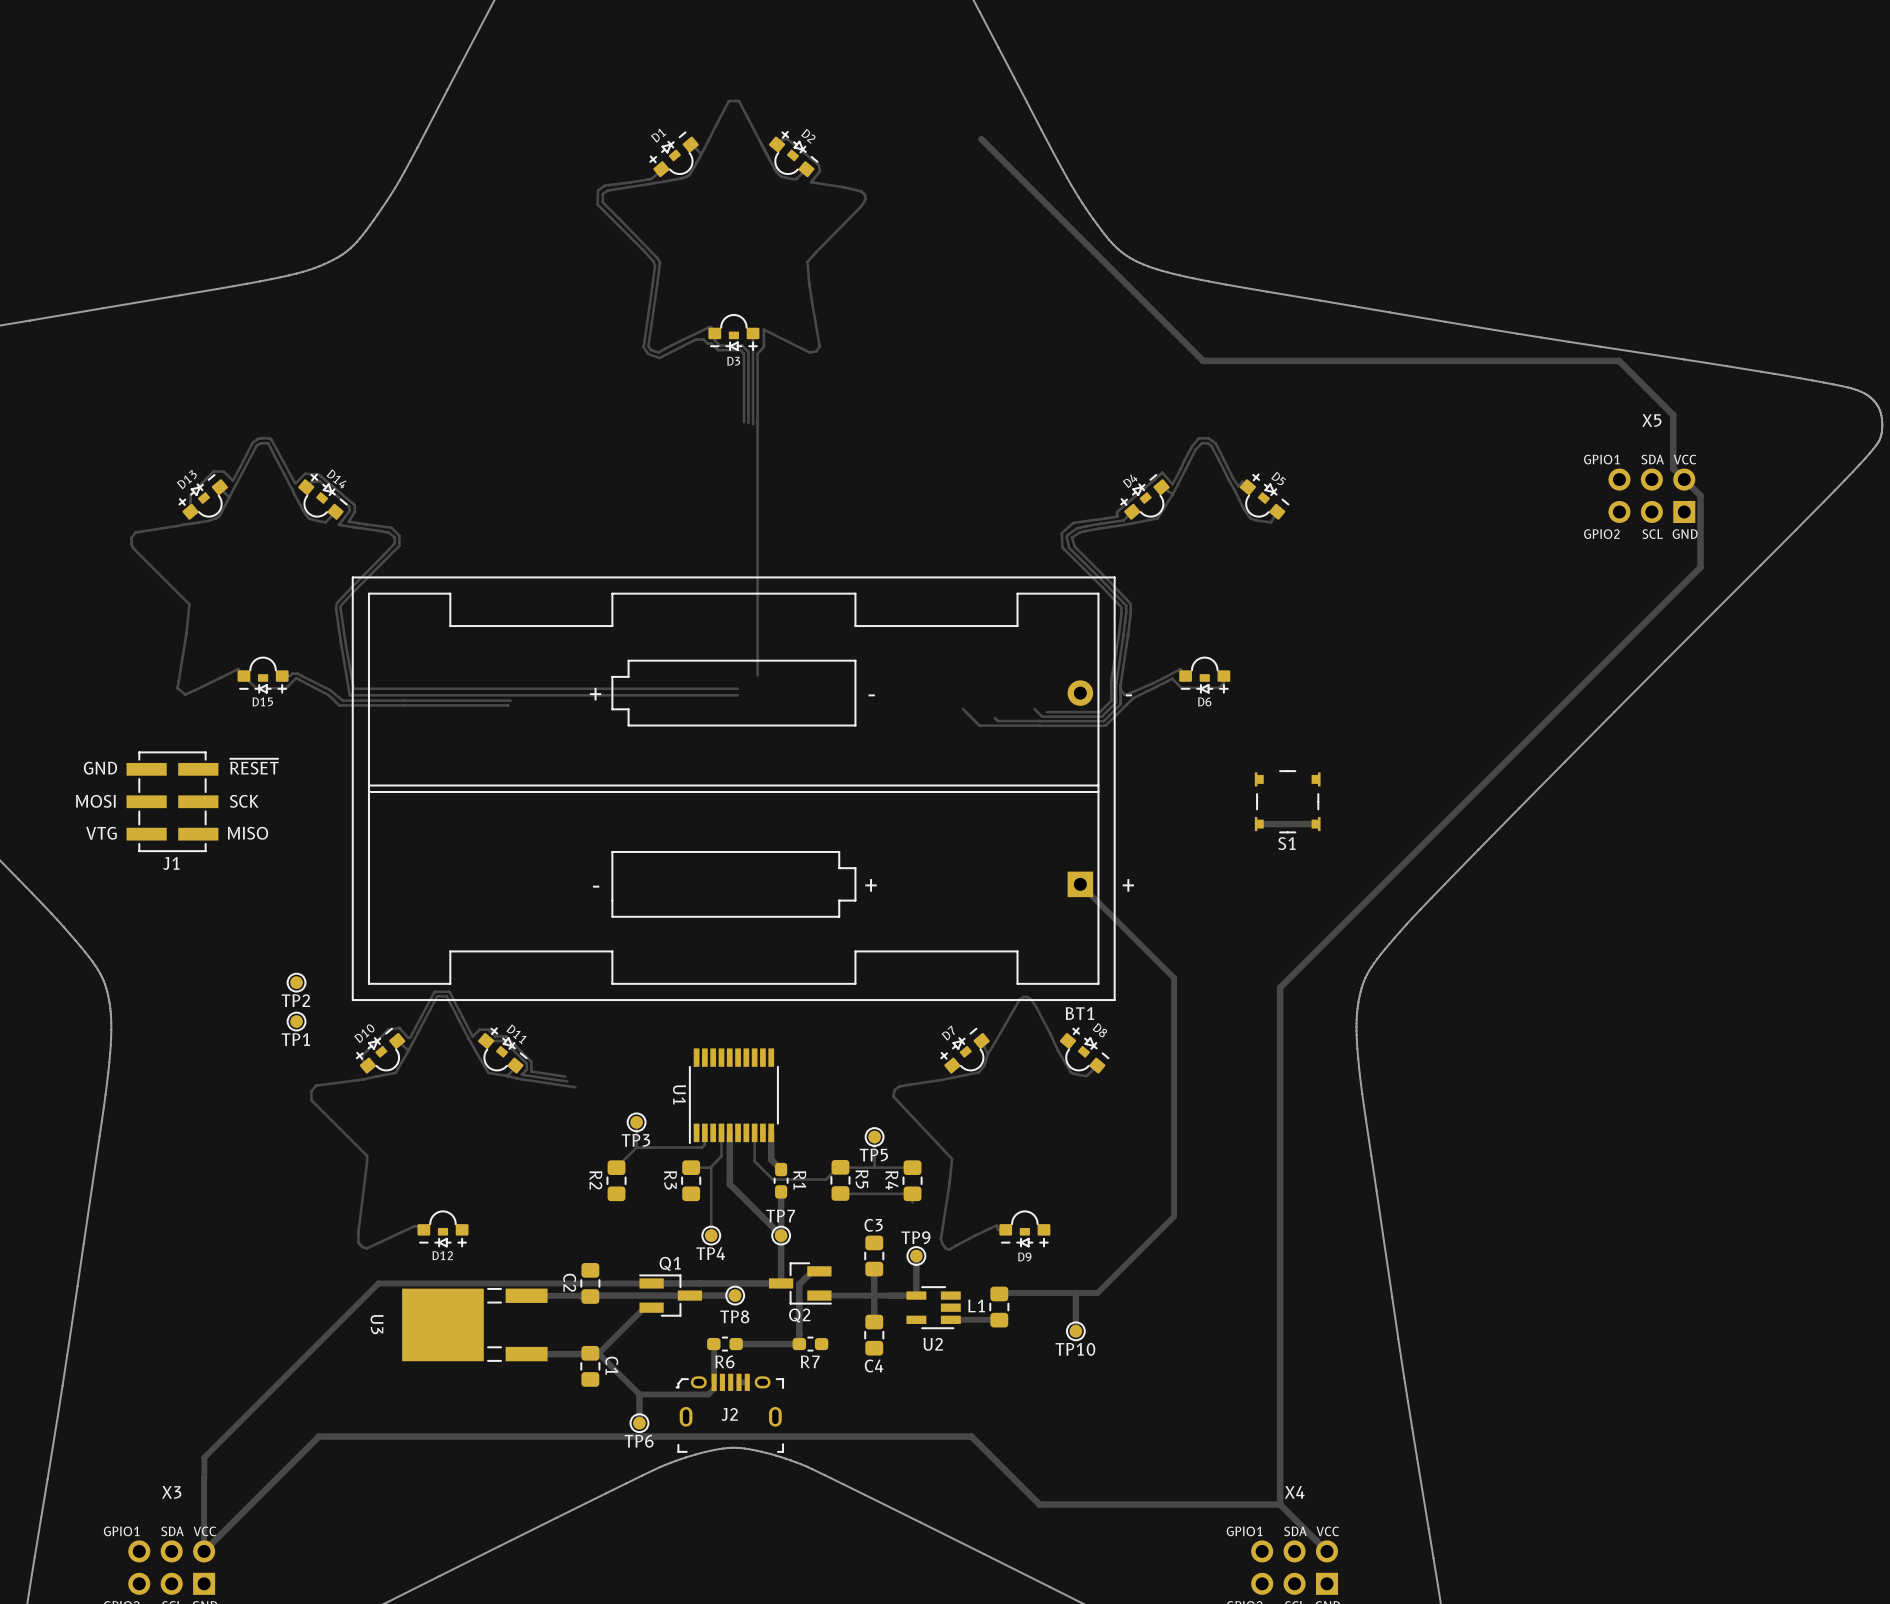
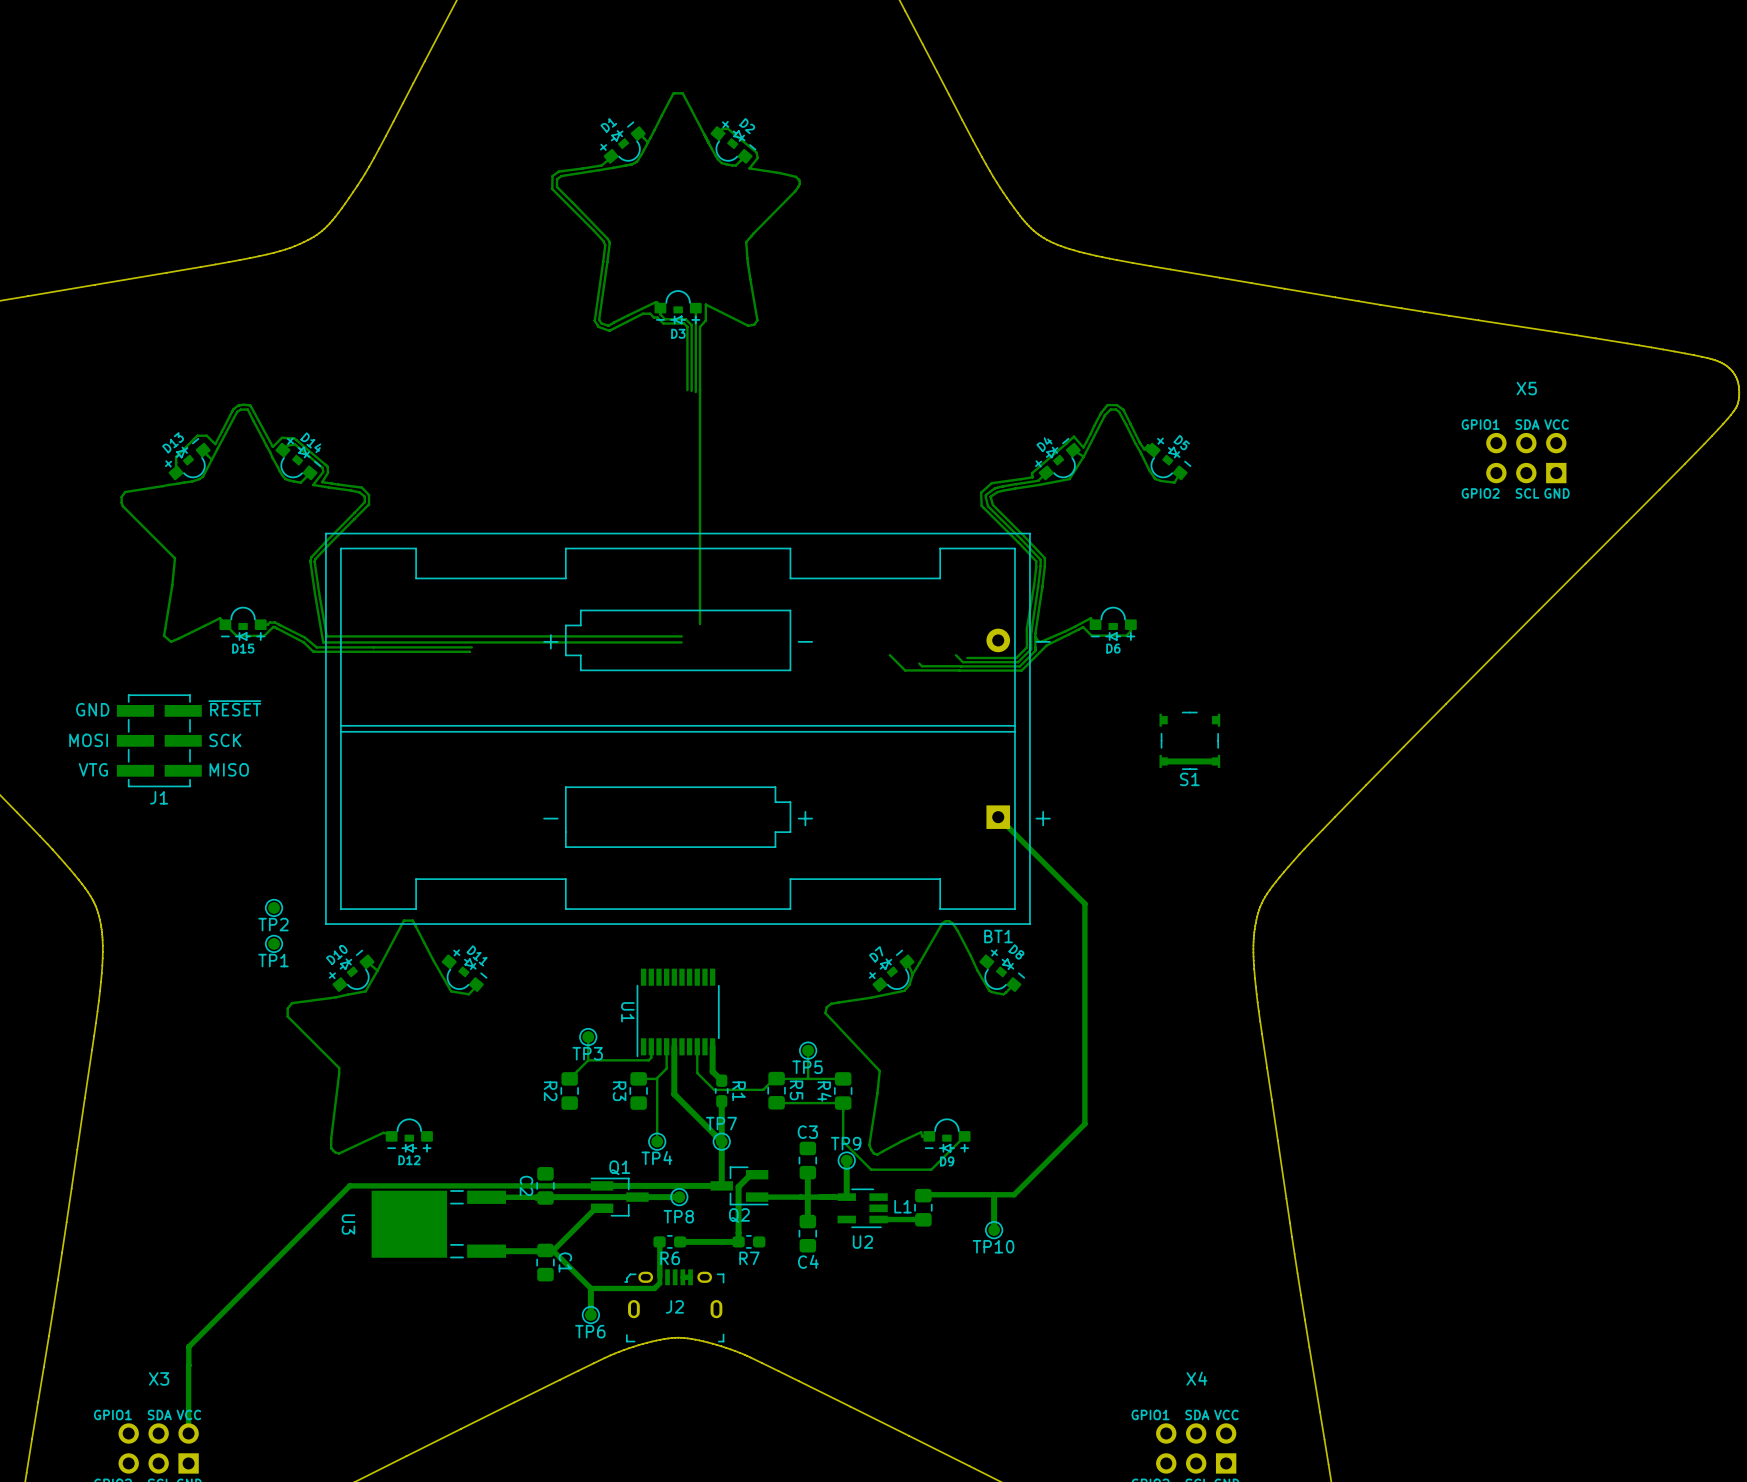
track: (981, 139) (1203, 360) (1619, 360) (1673, 415) (1673, 468) (1700, 495) (1700, 567) (1280, 987) (1280, 1504) -> none
track: (486, 1040) (504, 1040) (526, 1063) (526, 1069) (521, 1074) (567, 1081) -> none
track: (367, 1065) (362, 1059) (362, 1055) (388, 1029) (399, 1027) (410, 1037) (434, 992) (448, 991) (472, 1036) (479, 1029) (488, 1029) (495, 1036) (506, 1036) (531, 1061) (531, 1071) (565, 1076) -> none
track: (507, 1076) (575, 1087) -> none
track: none -> (843, 1111) (843, 1141) (871, 1169) (931, 1169) (964, 1136)
track: (1280, 1504) (1039, 1504) (971, 1436) (318, 1436) (204, 1551) -> none
track: (1280, 1504) (1327, 1551) -> none

